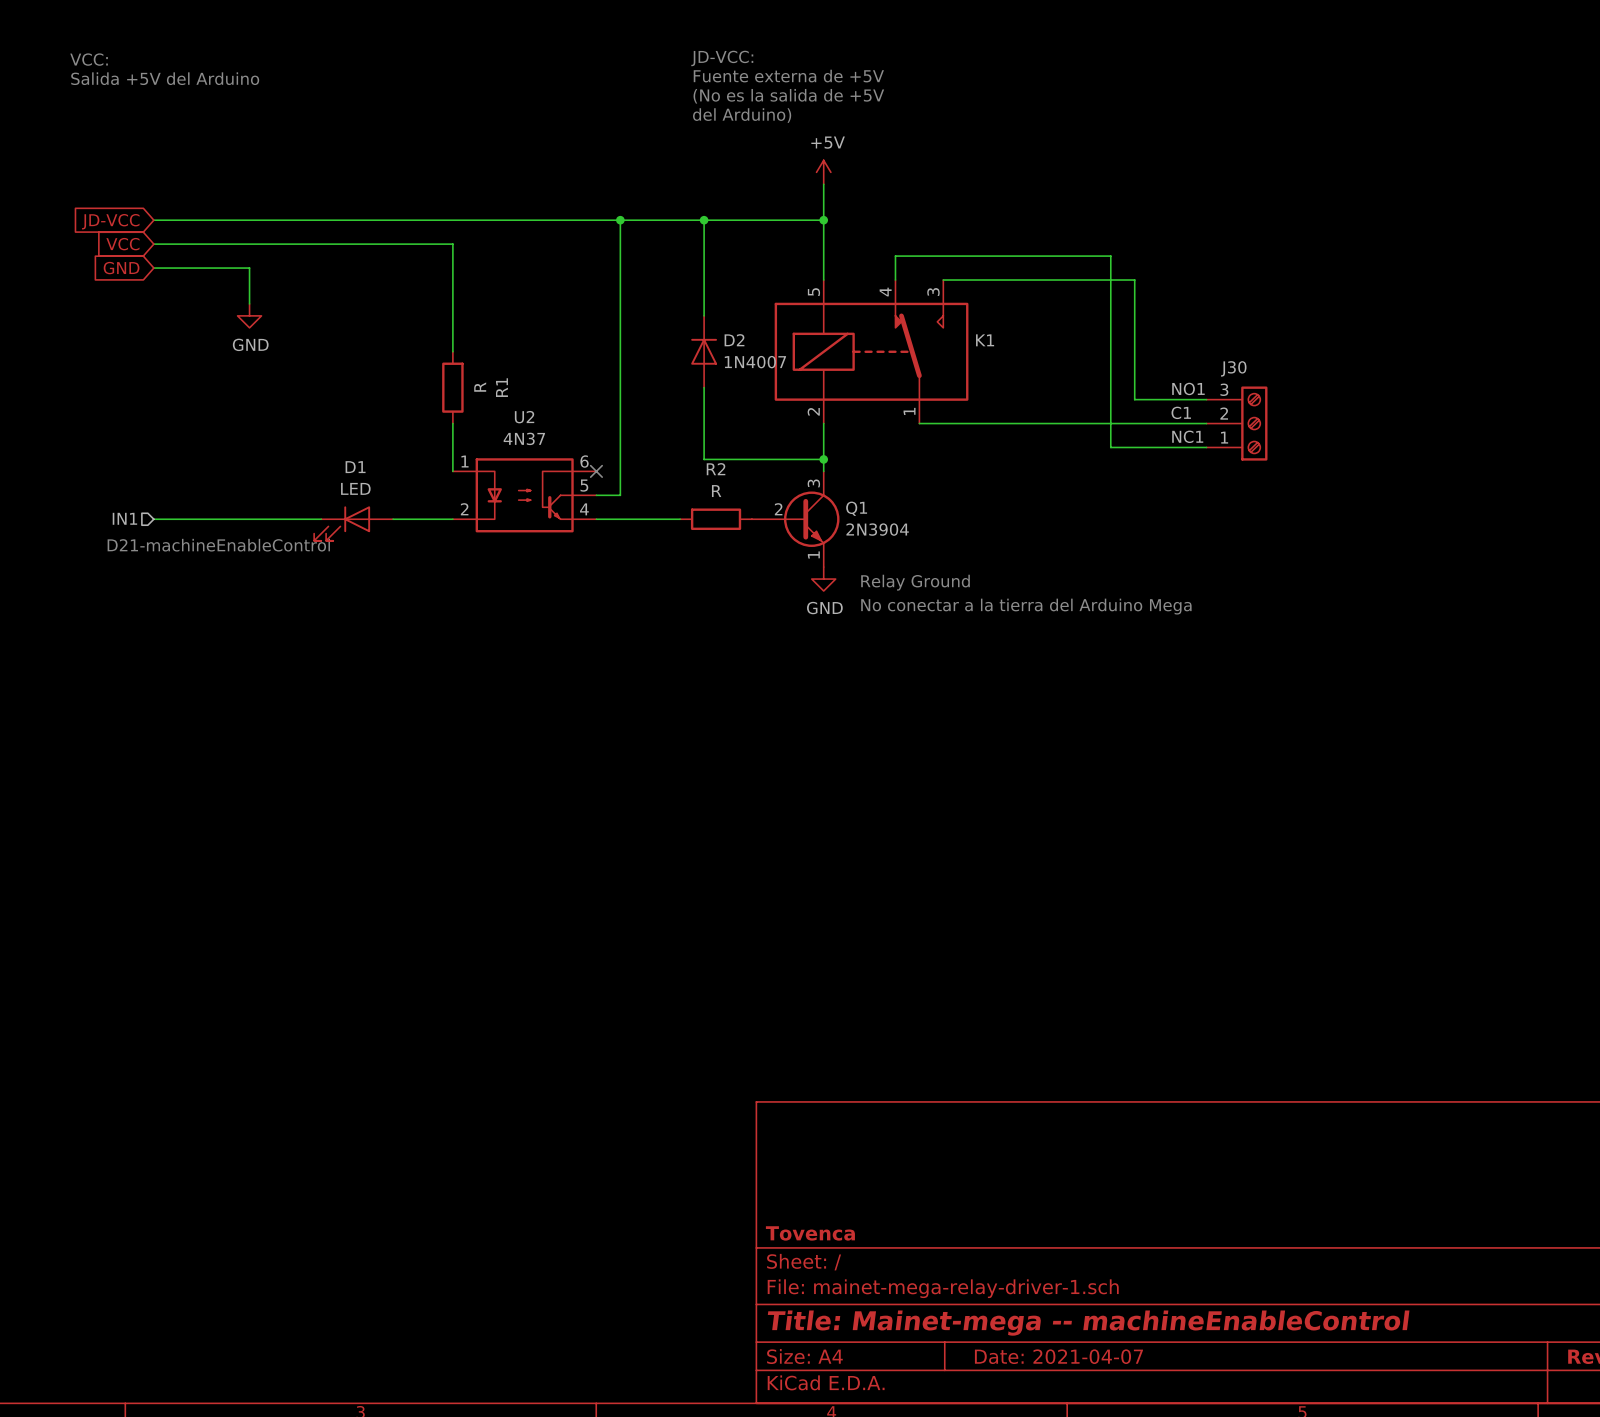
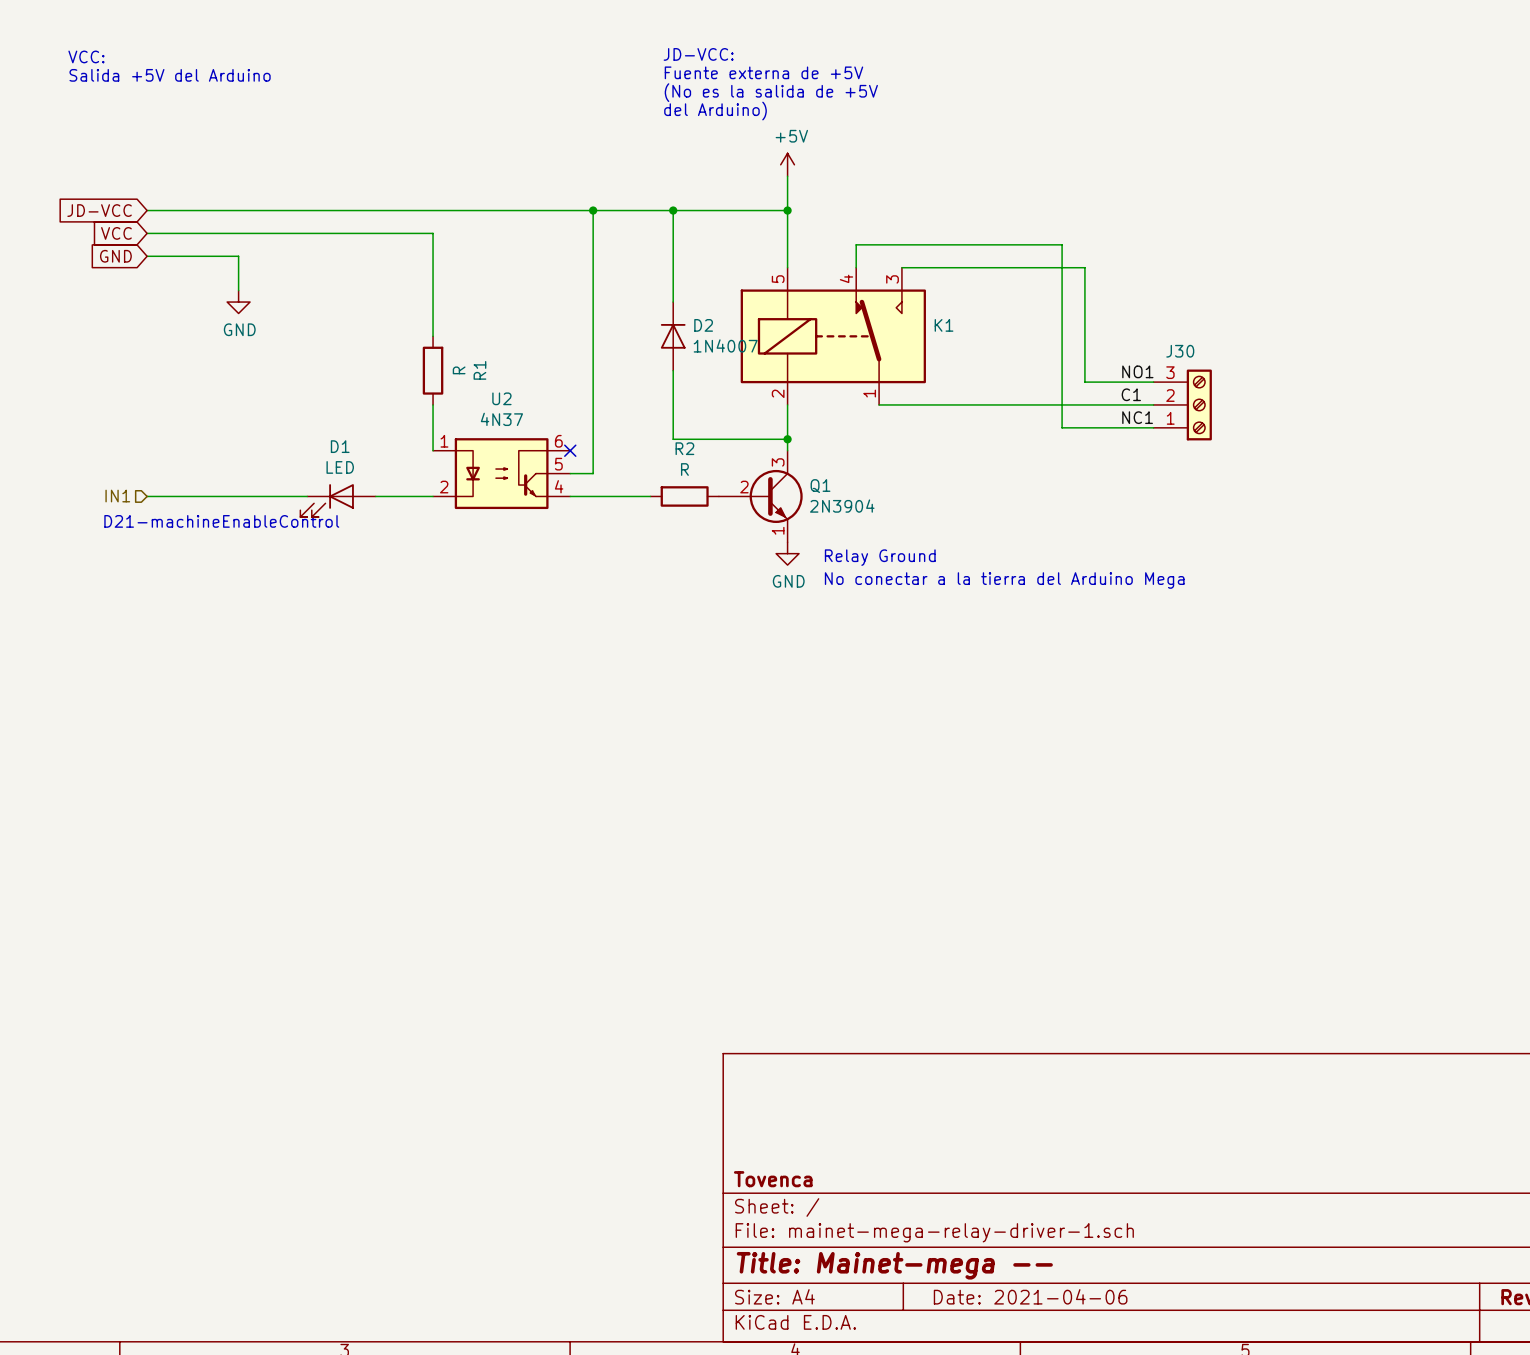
title block: Title: Mainet-mega -- machineEnableControl (1088, 1323) -> Title: Mainet-mega -- (894, 1265)
title block: Date: 2021-04-07 (1058, 1356) -> Date: 2021-04-06 (1030, 1296)

